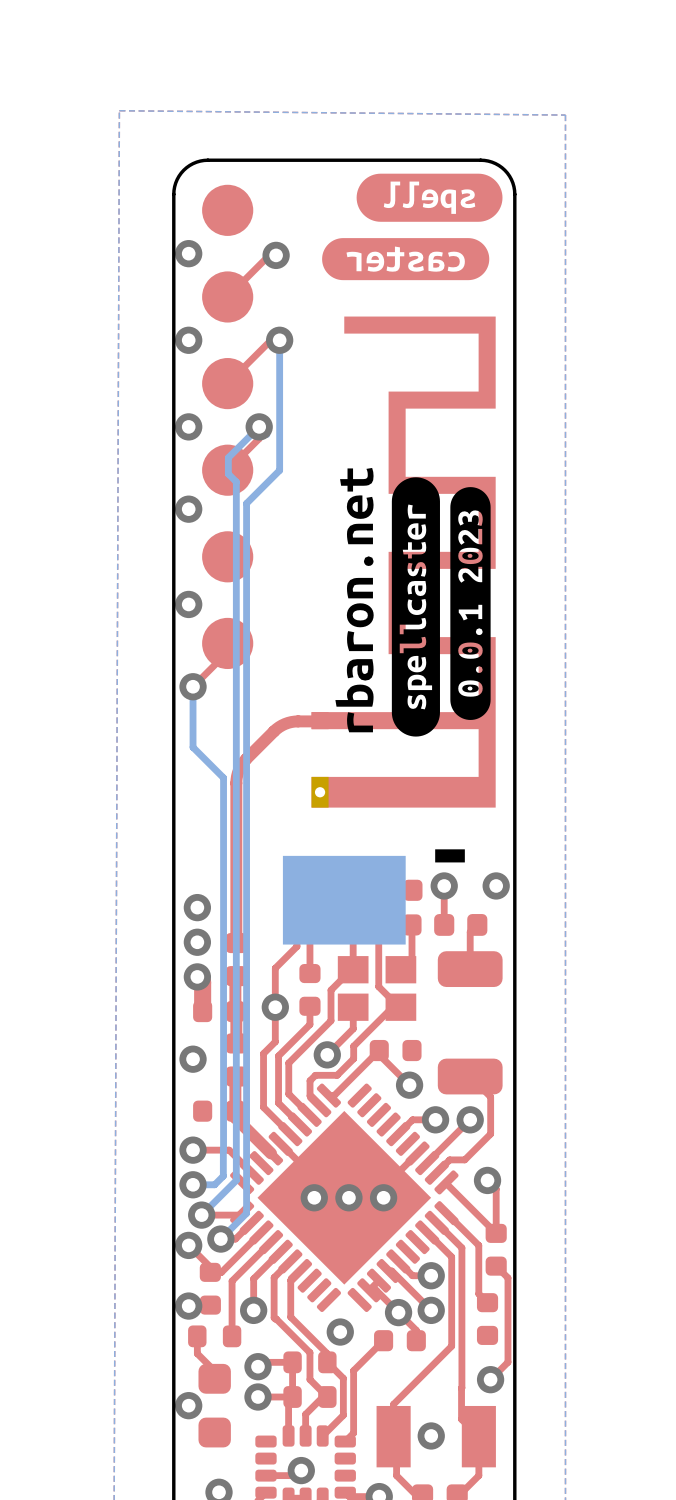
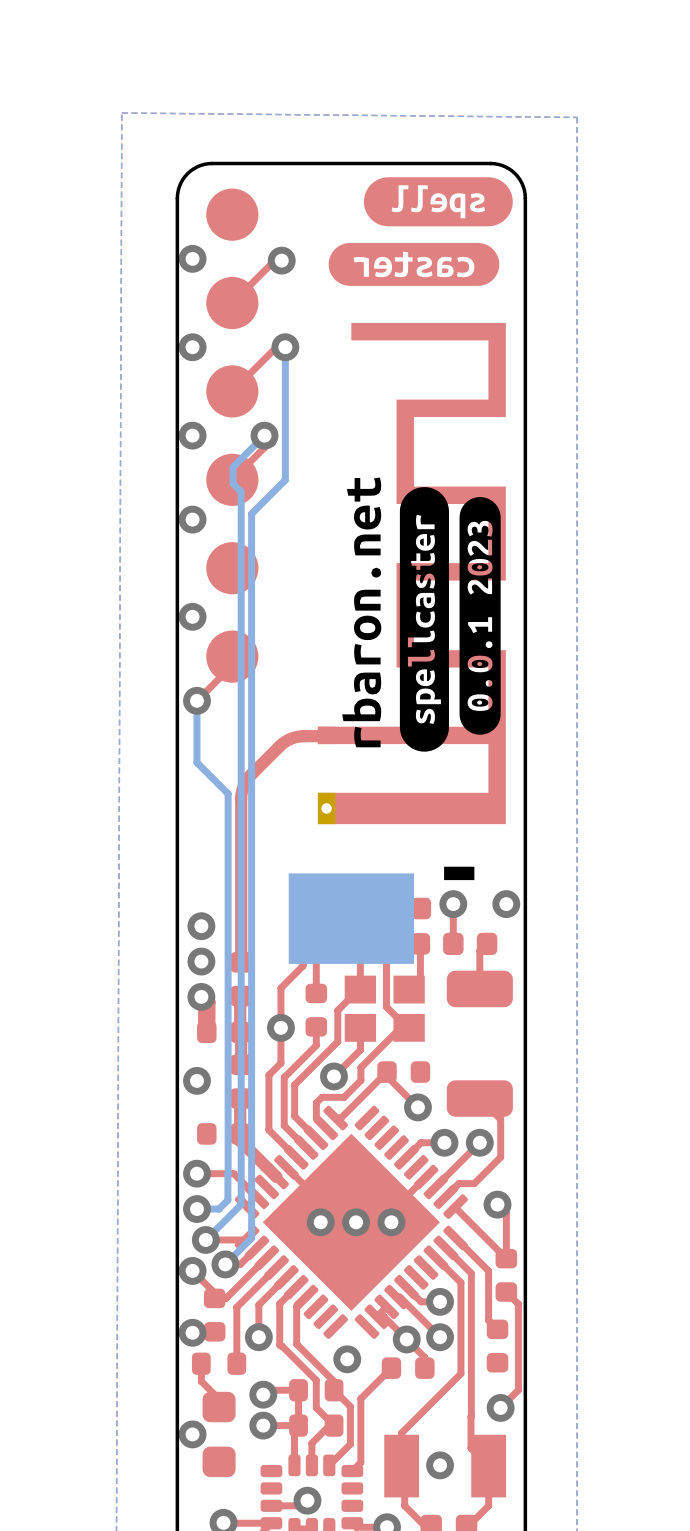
top track: none -> (229, 1520) (232, 1523) (271, 1523)

